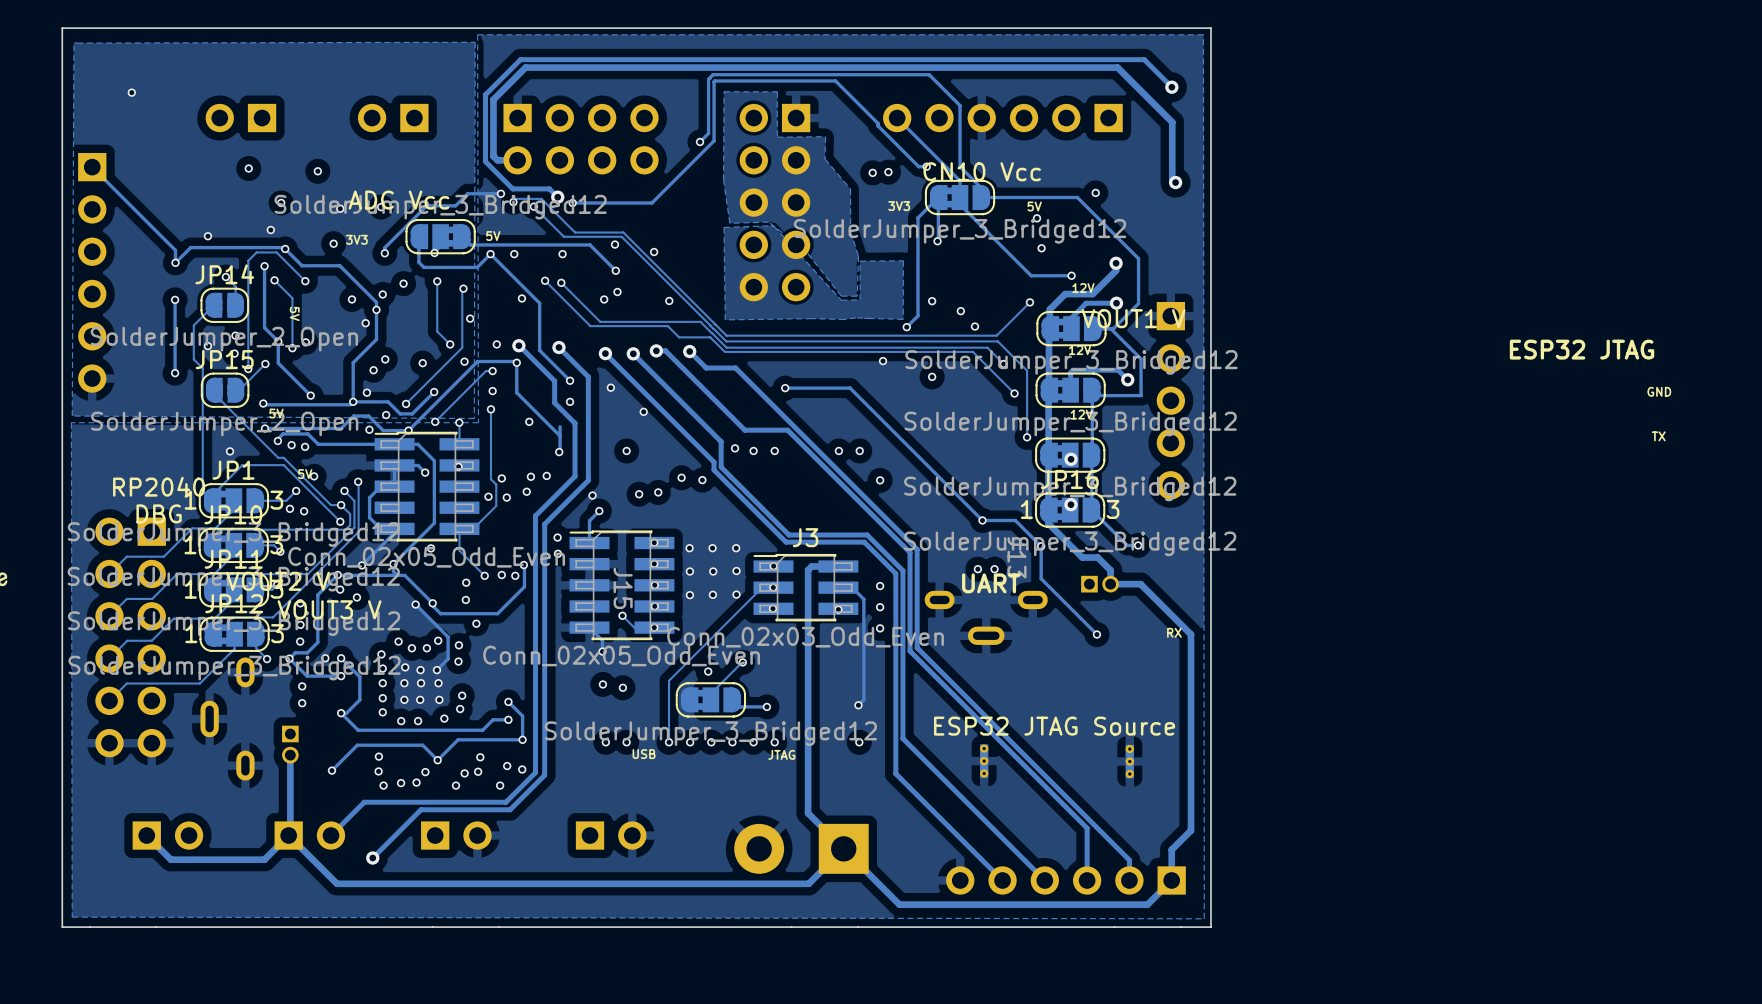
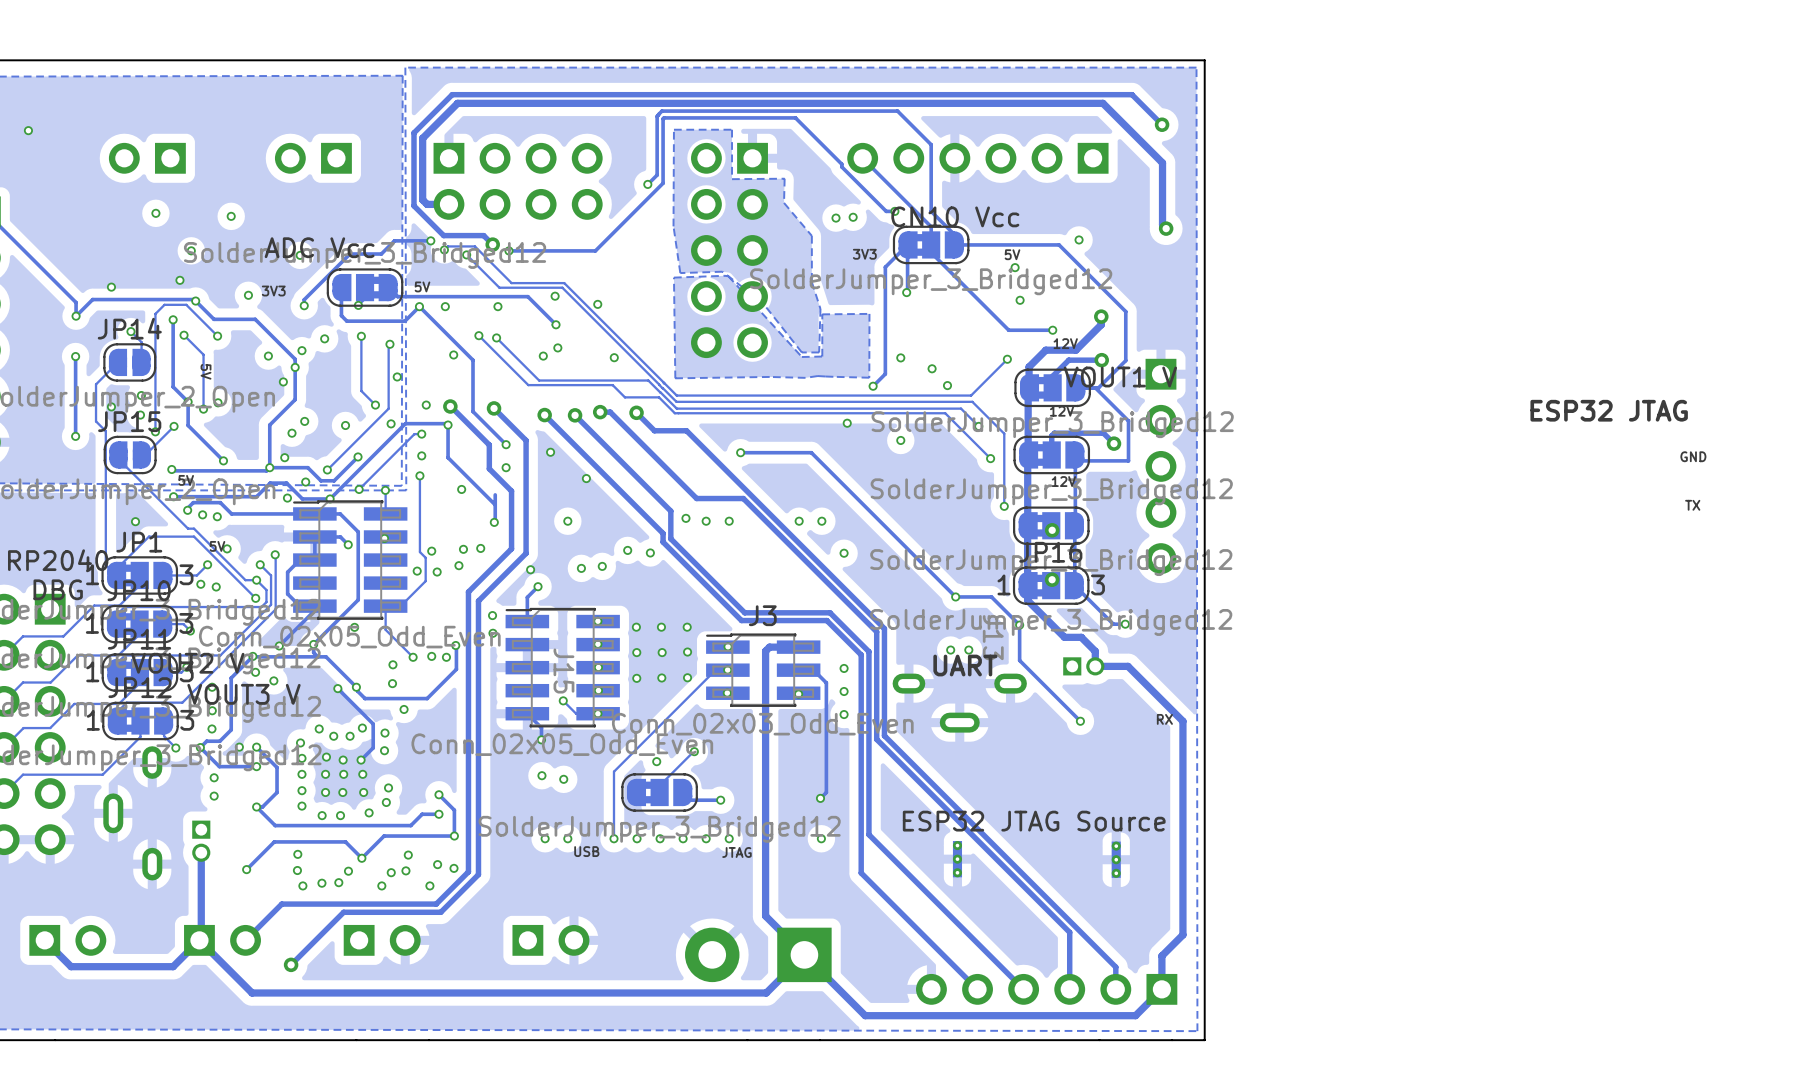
via: (340, 208) -> none

